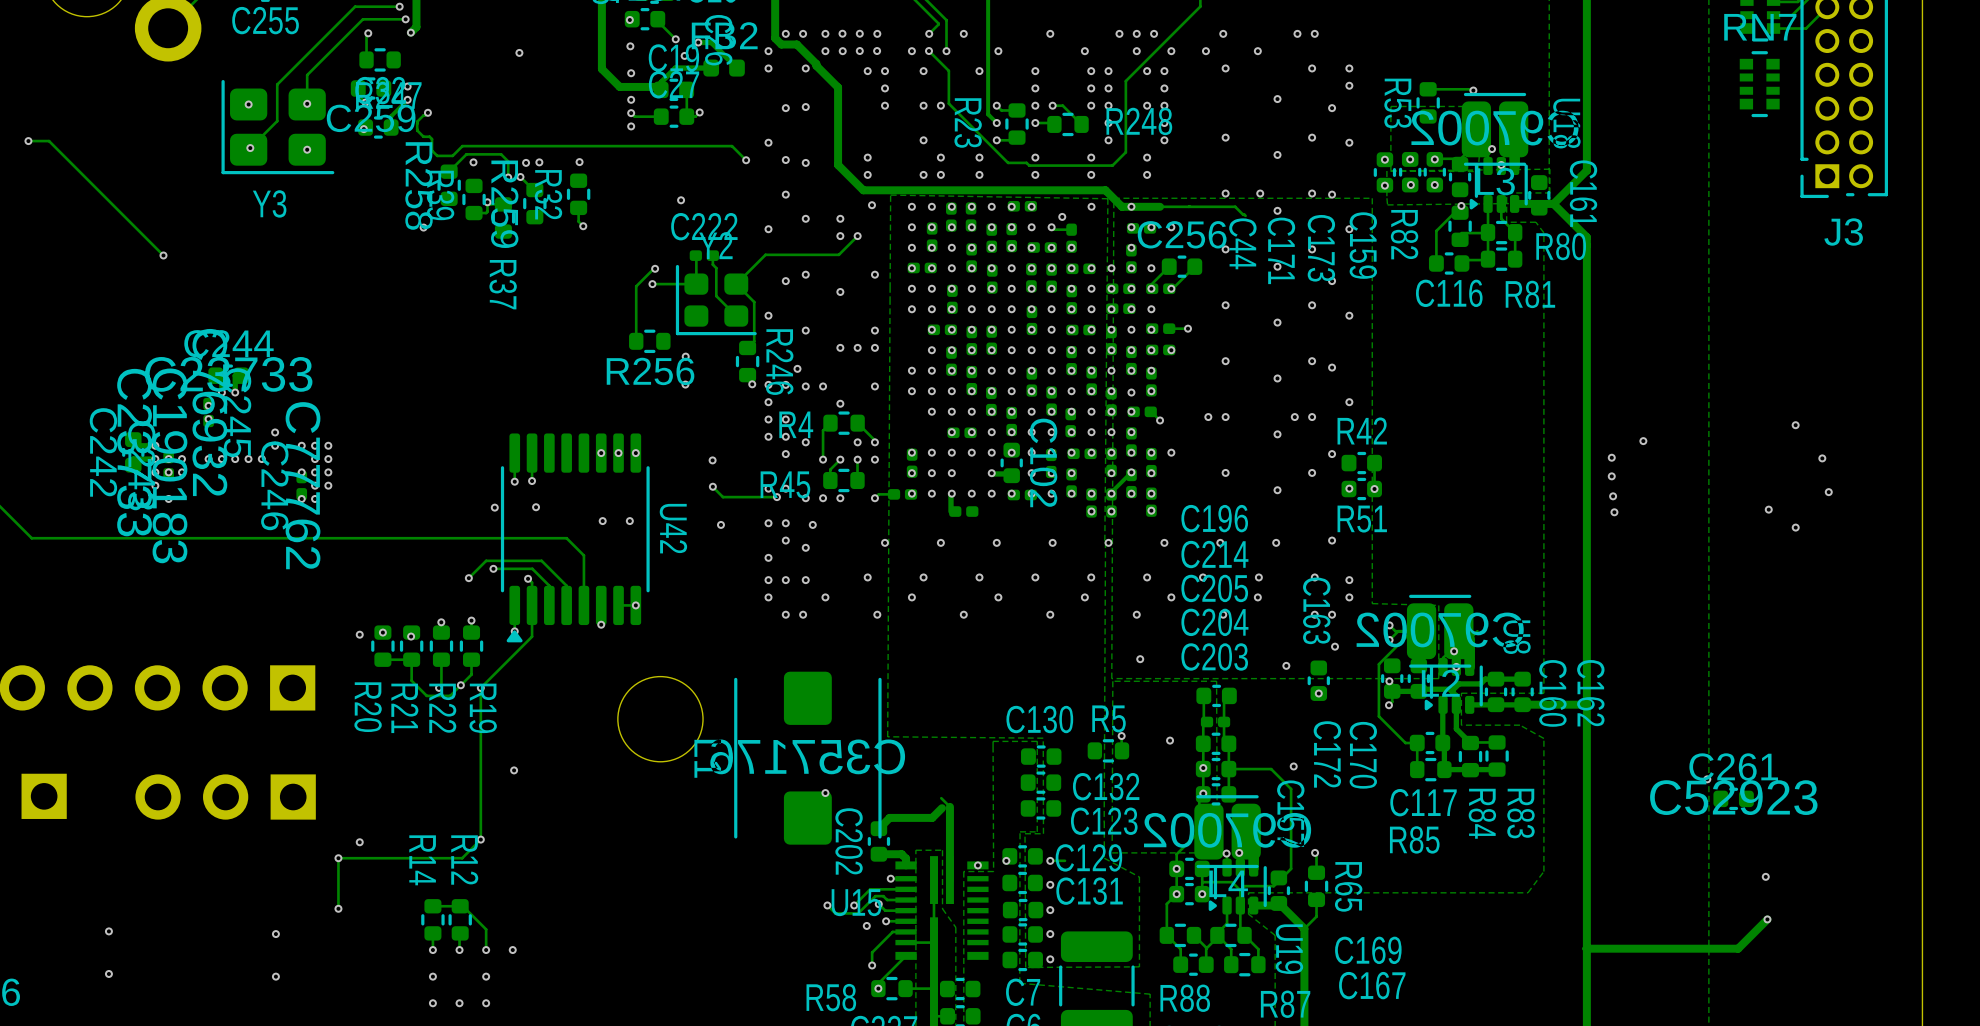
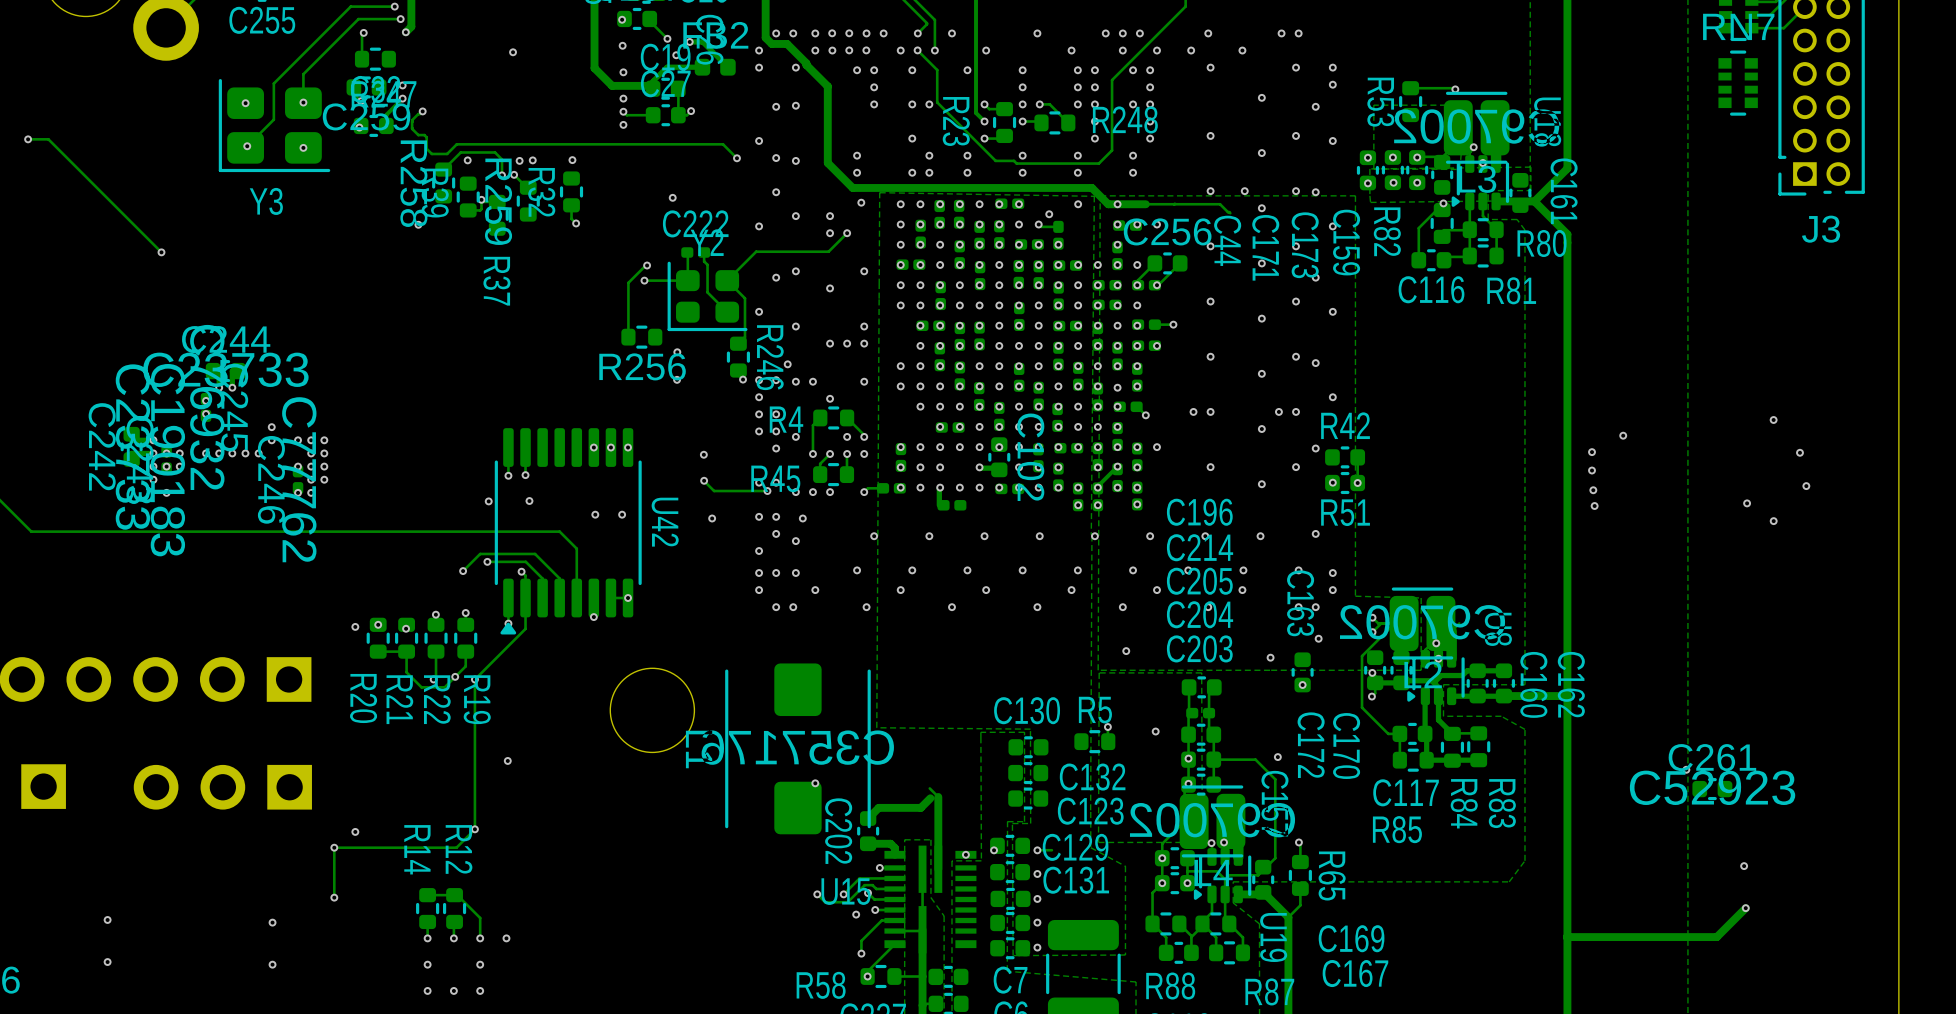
via: none -> (883, 33)

